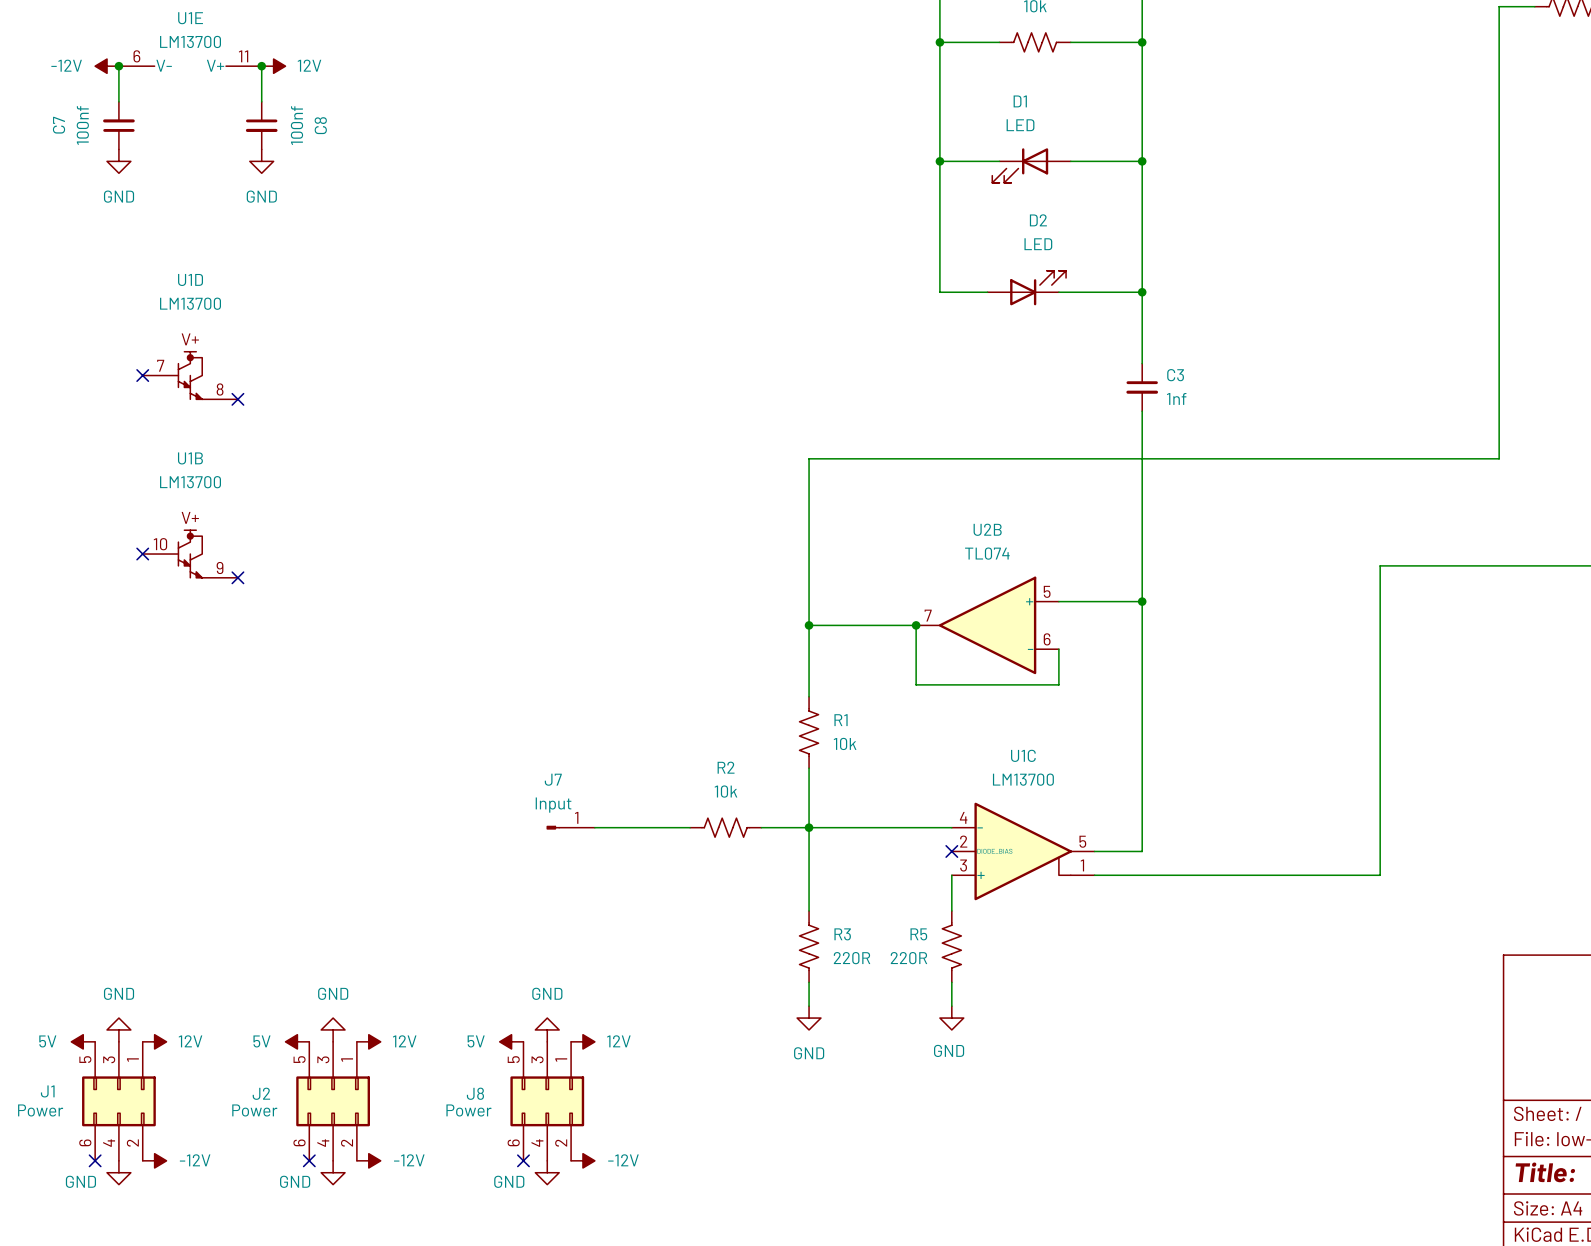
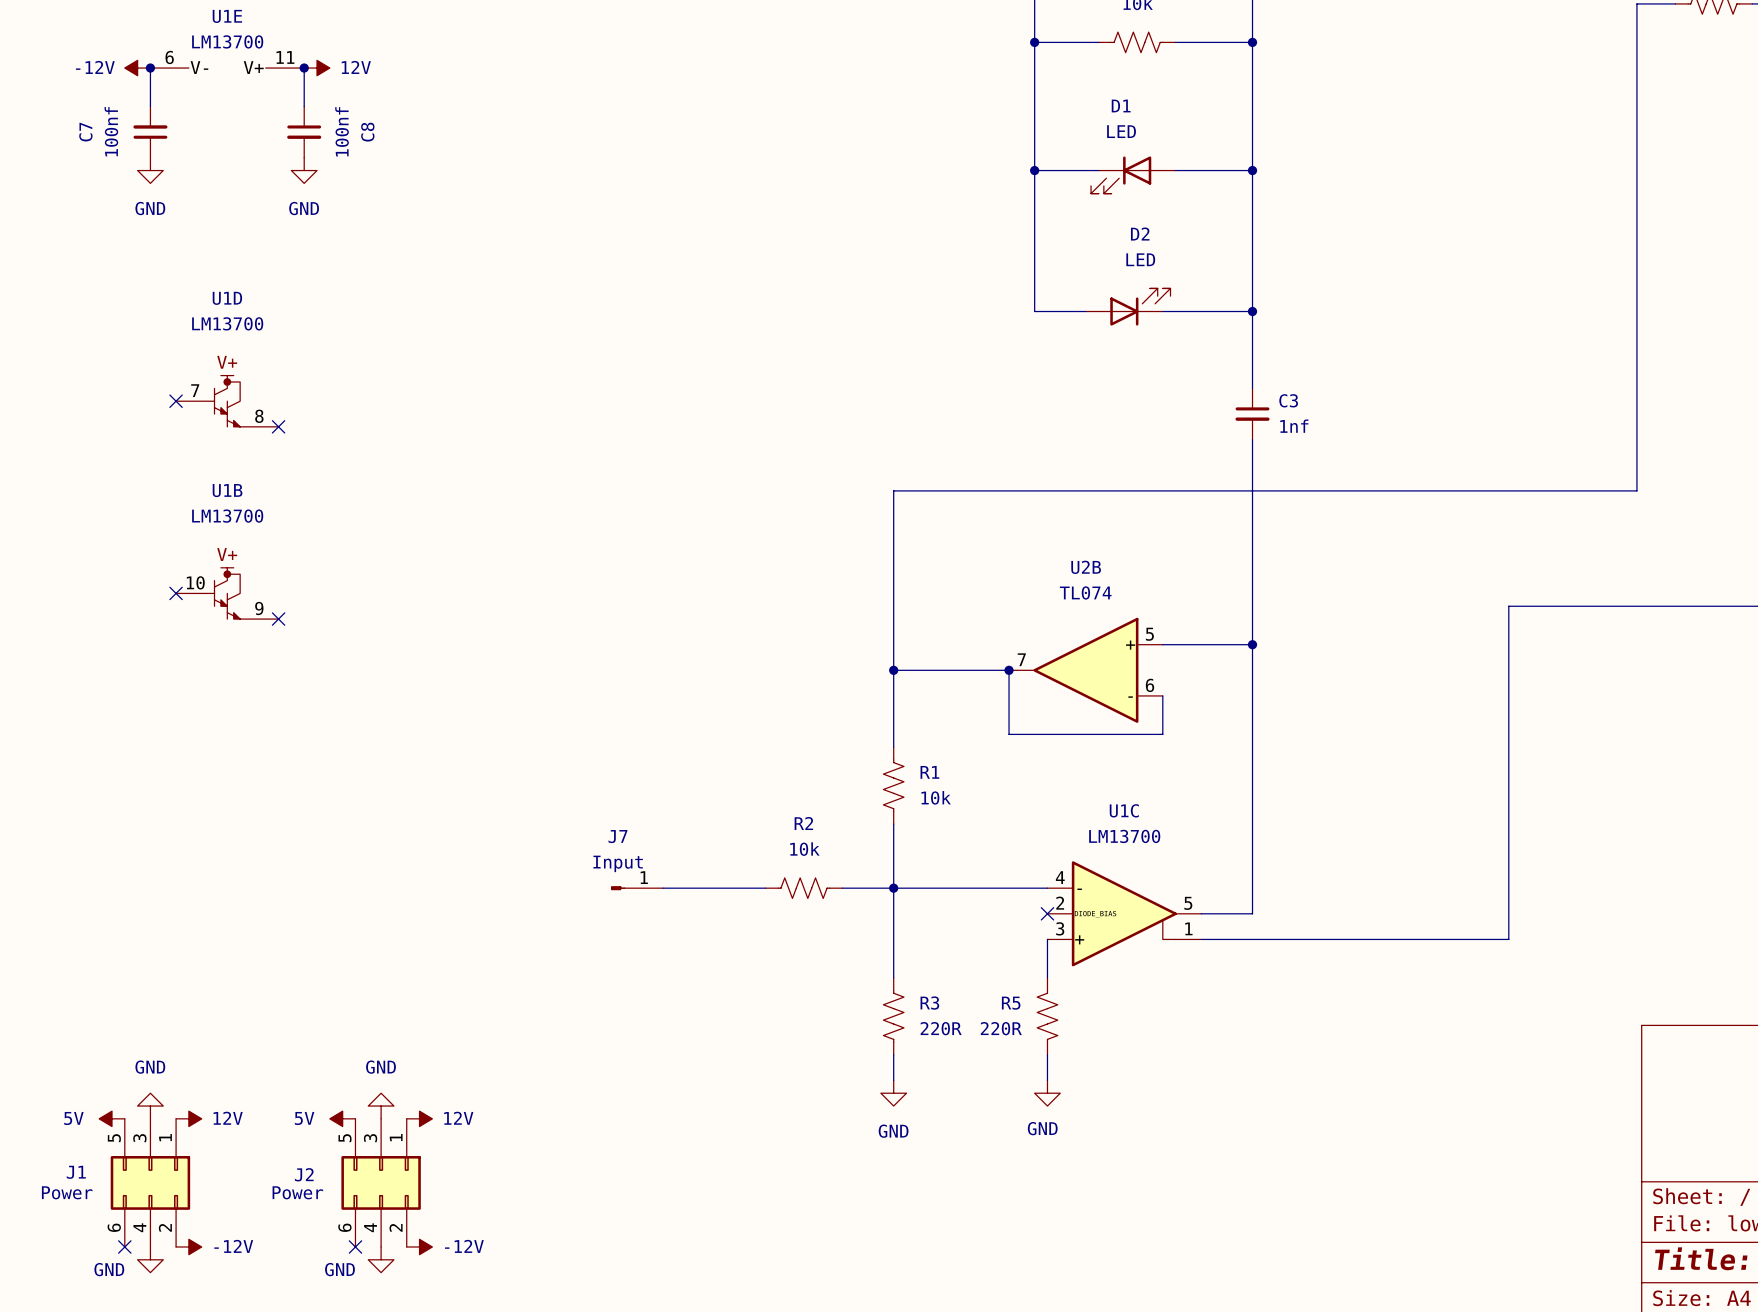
power symbol: GND (547, 1029) -> none
power symbol: 5V (511, 1041) -> none
power symbol: 12V (582, 1041) -> none
J8: Power (547, 1101) -> none
no-connect mark: (523, 1160) -> none
power symbol: -12V (582, 1160) -> none
power symbol: GND (547, 1172) -> none

